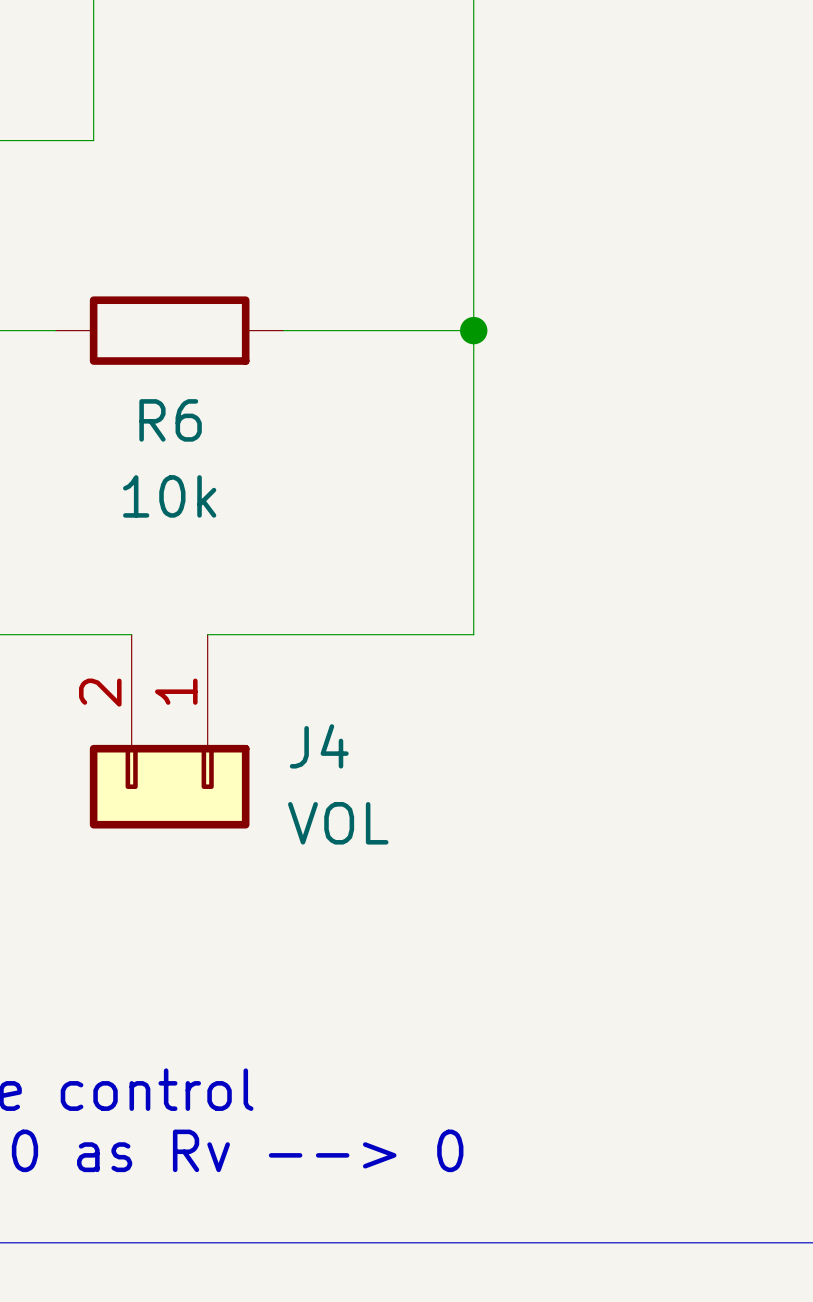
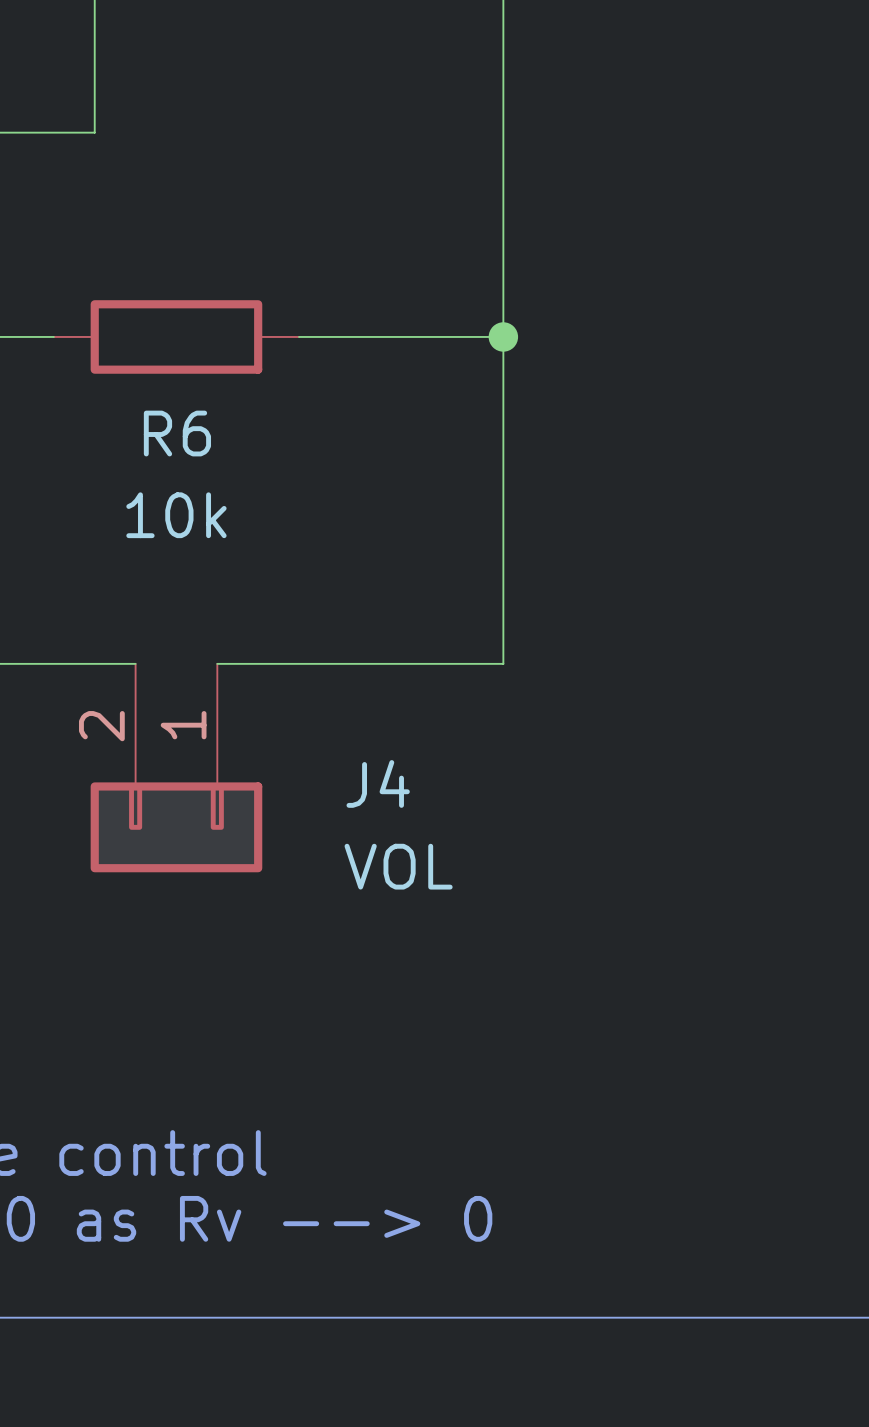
J4 name position: J4 (319, 746) -> J4 (378, 783)
J4 value position: VOL (338, 823) -> VOL (398, 866)

